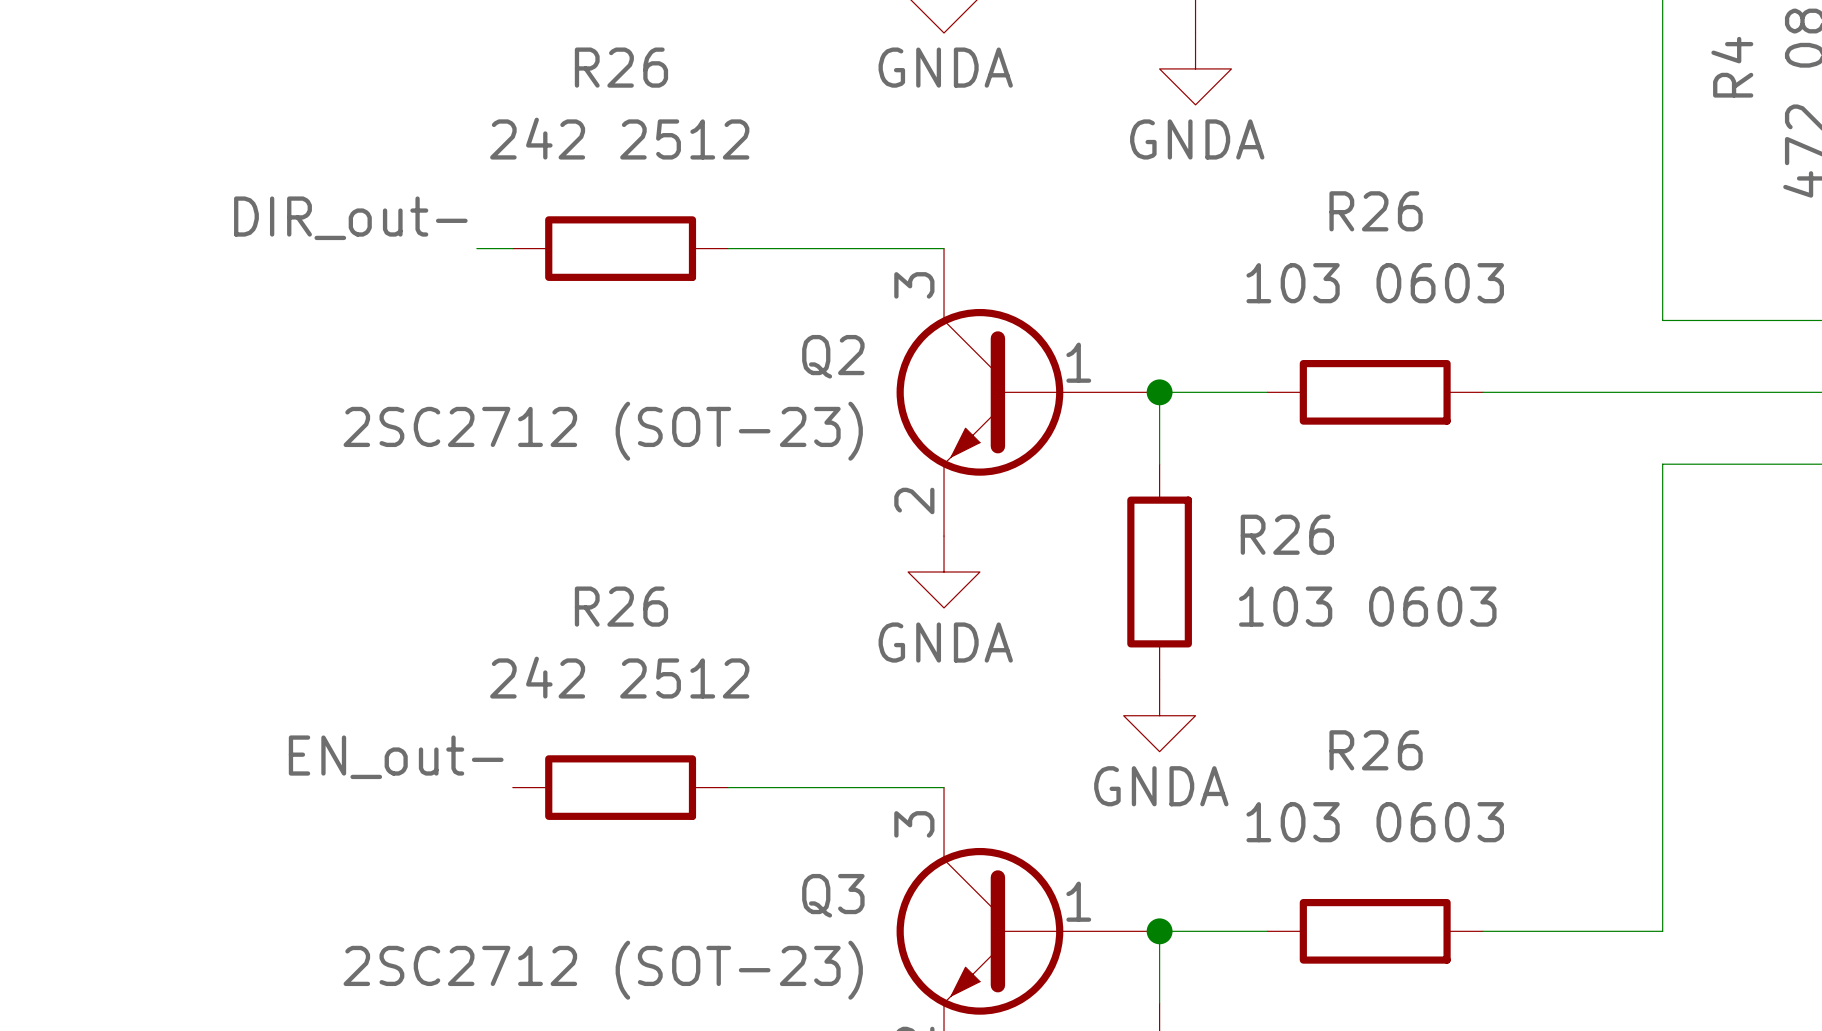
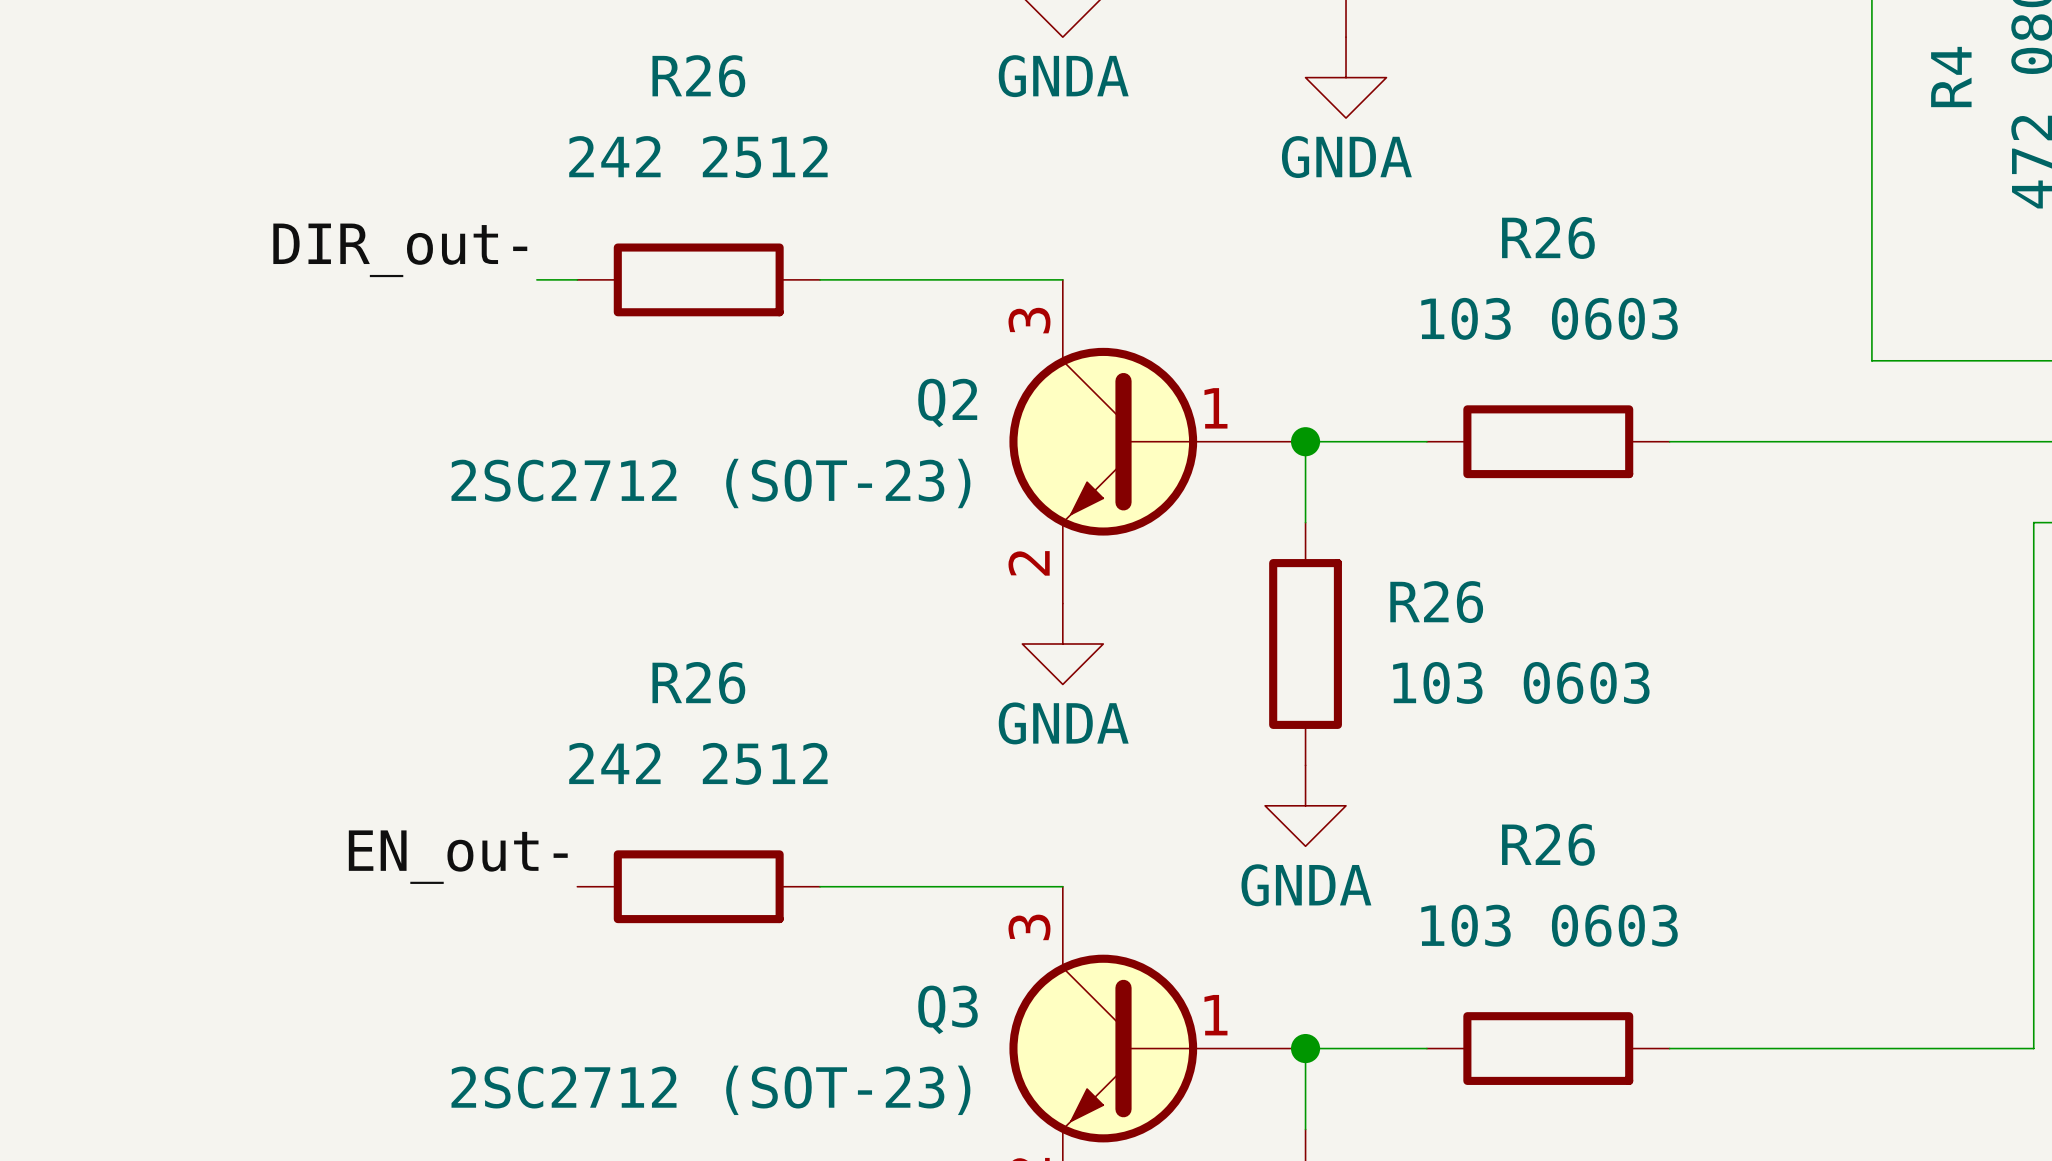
wire: (1806, 464) (1662, 464) (1662, 931) -> (2033, 522) (2033, 1048) (1871, 1048)

